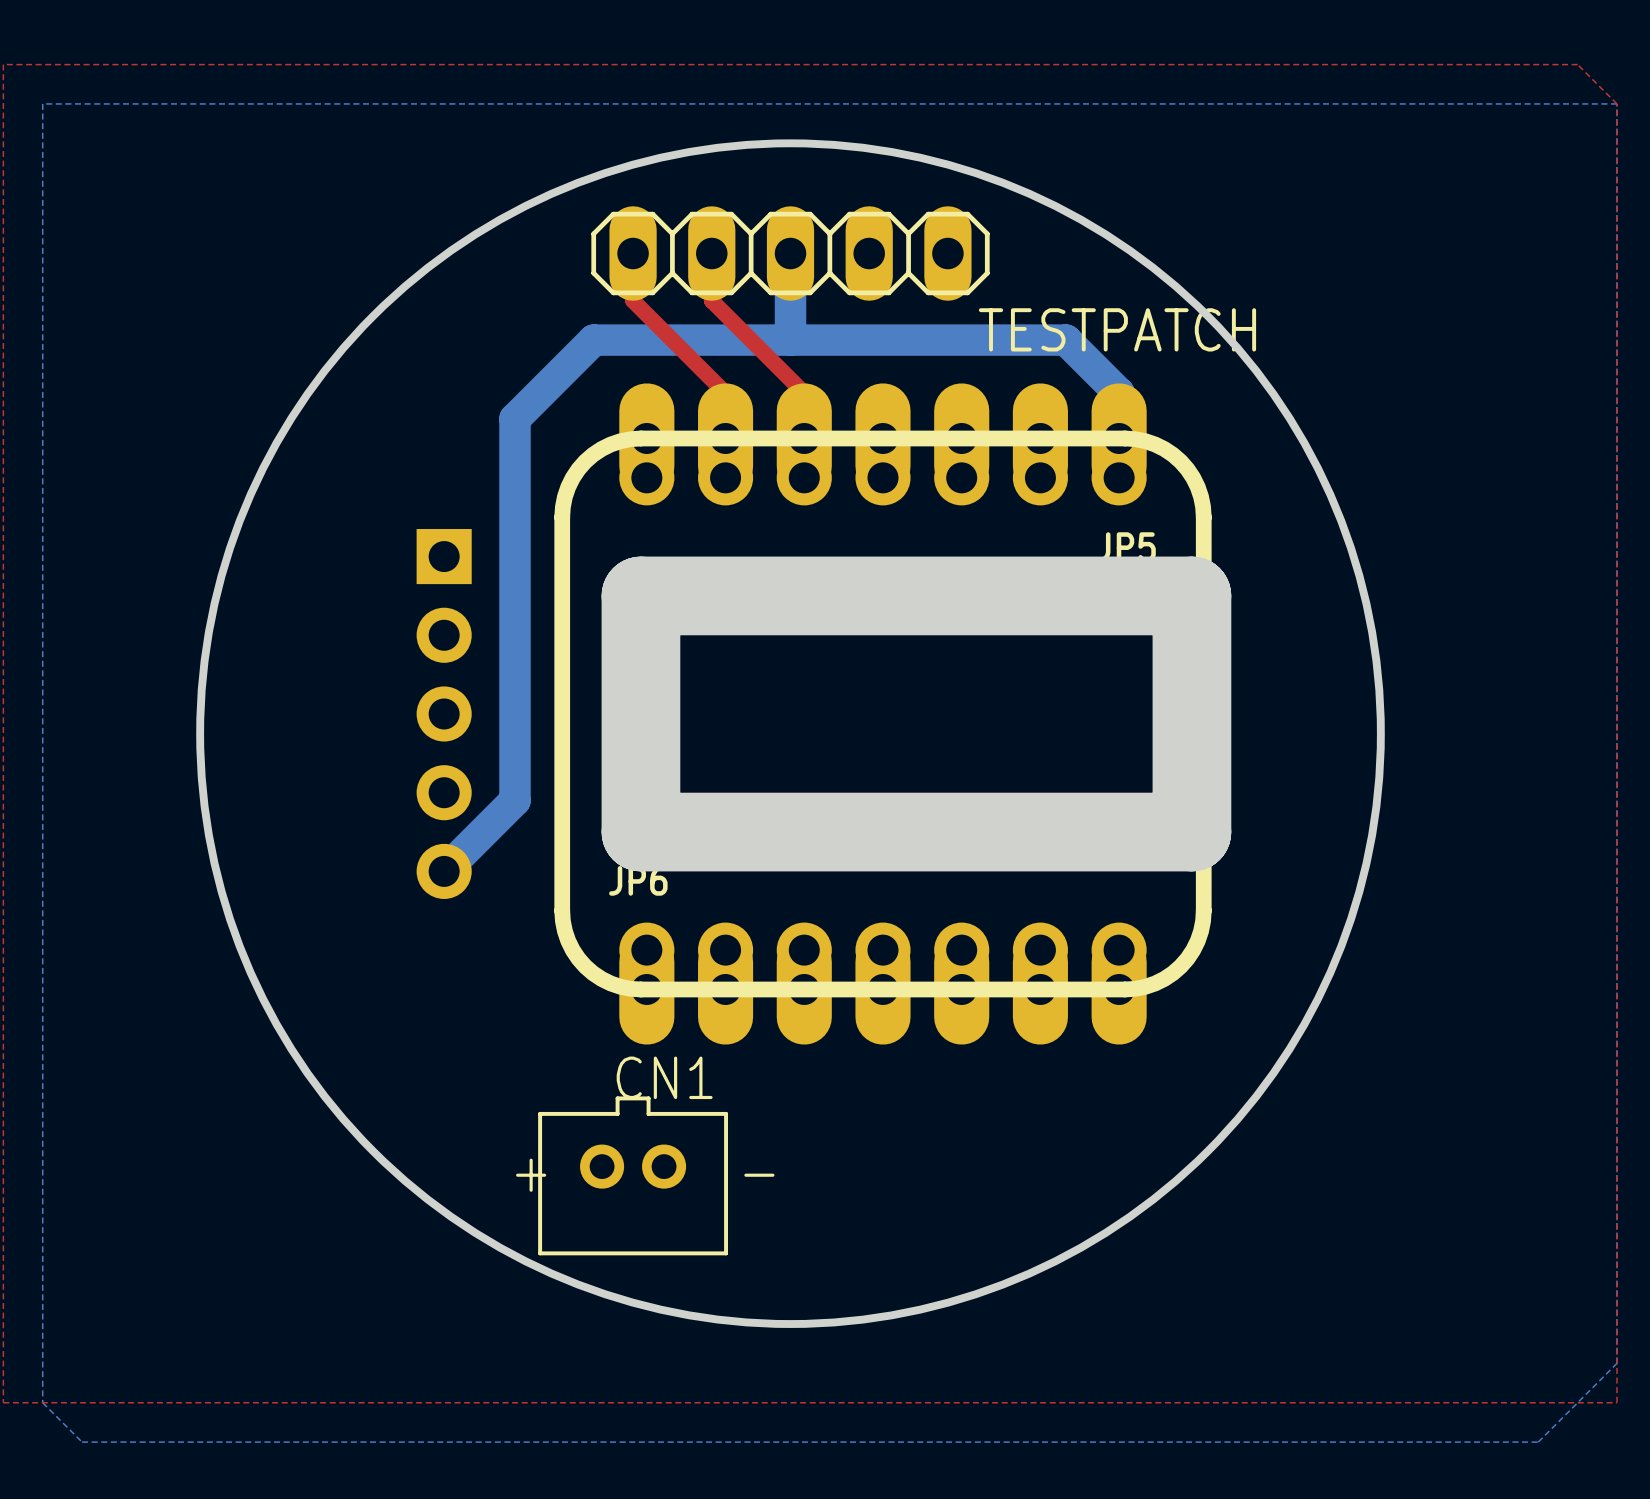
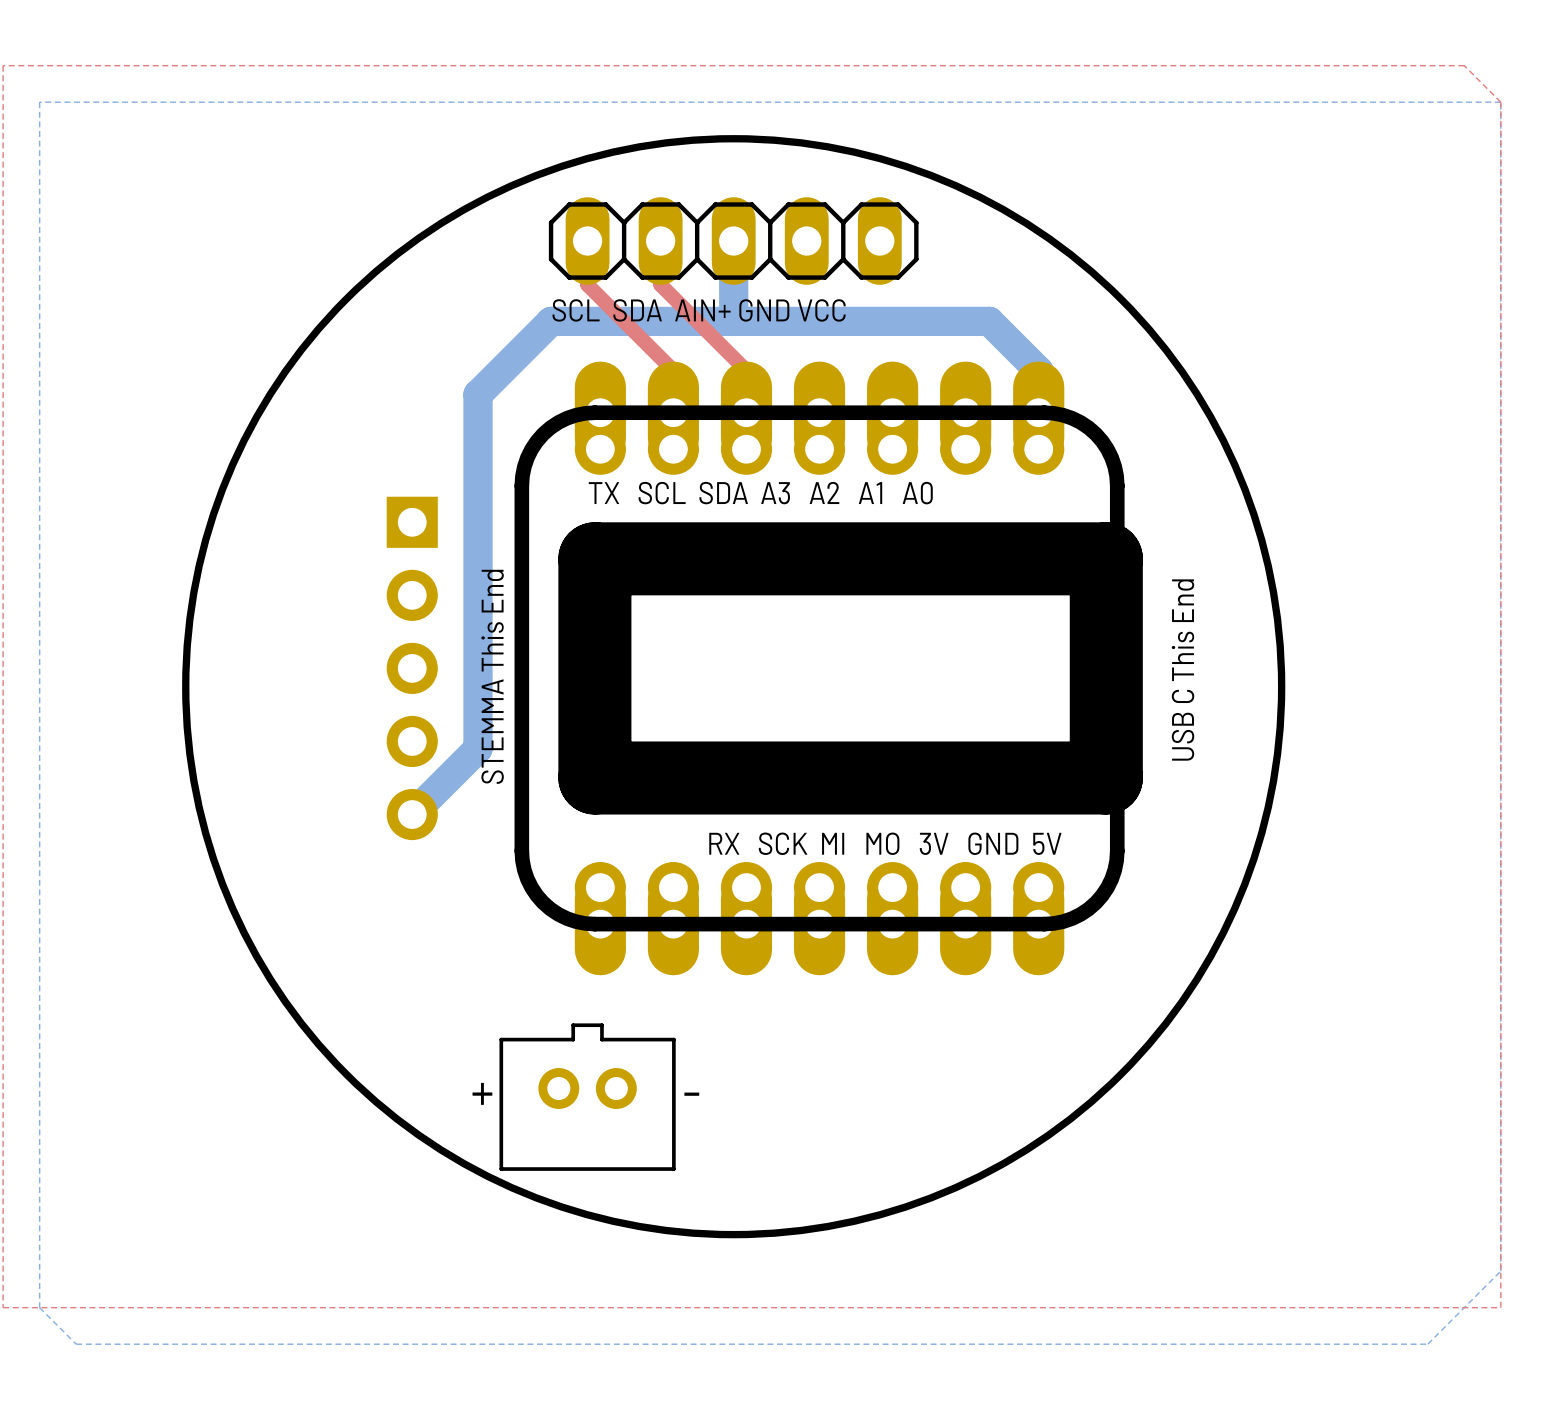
text: none -> SCL SDA AIN+ GND VCC (699, 310)
TESTPATCH name: TESTPATCH (1117, 329) -> none
text: none -> TX SCL SDA A3 A2 A1 A0 (760, 493)
JP5 name: JP5 (1126, 547) -> none
text: none -> STEMMA This End (492, 676)
text: none -> USB C This End (1183, 670)
JP6 name: JP6 (638, 880) -> none
text: none -> RX SCK MI MO 3V GND 5V (885, 843)
CN1 name: CN1 (664, 1077) -> none

